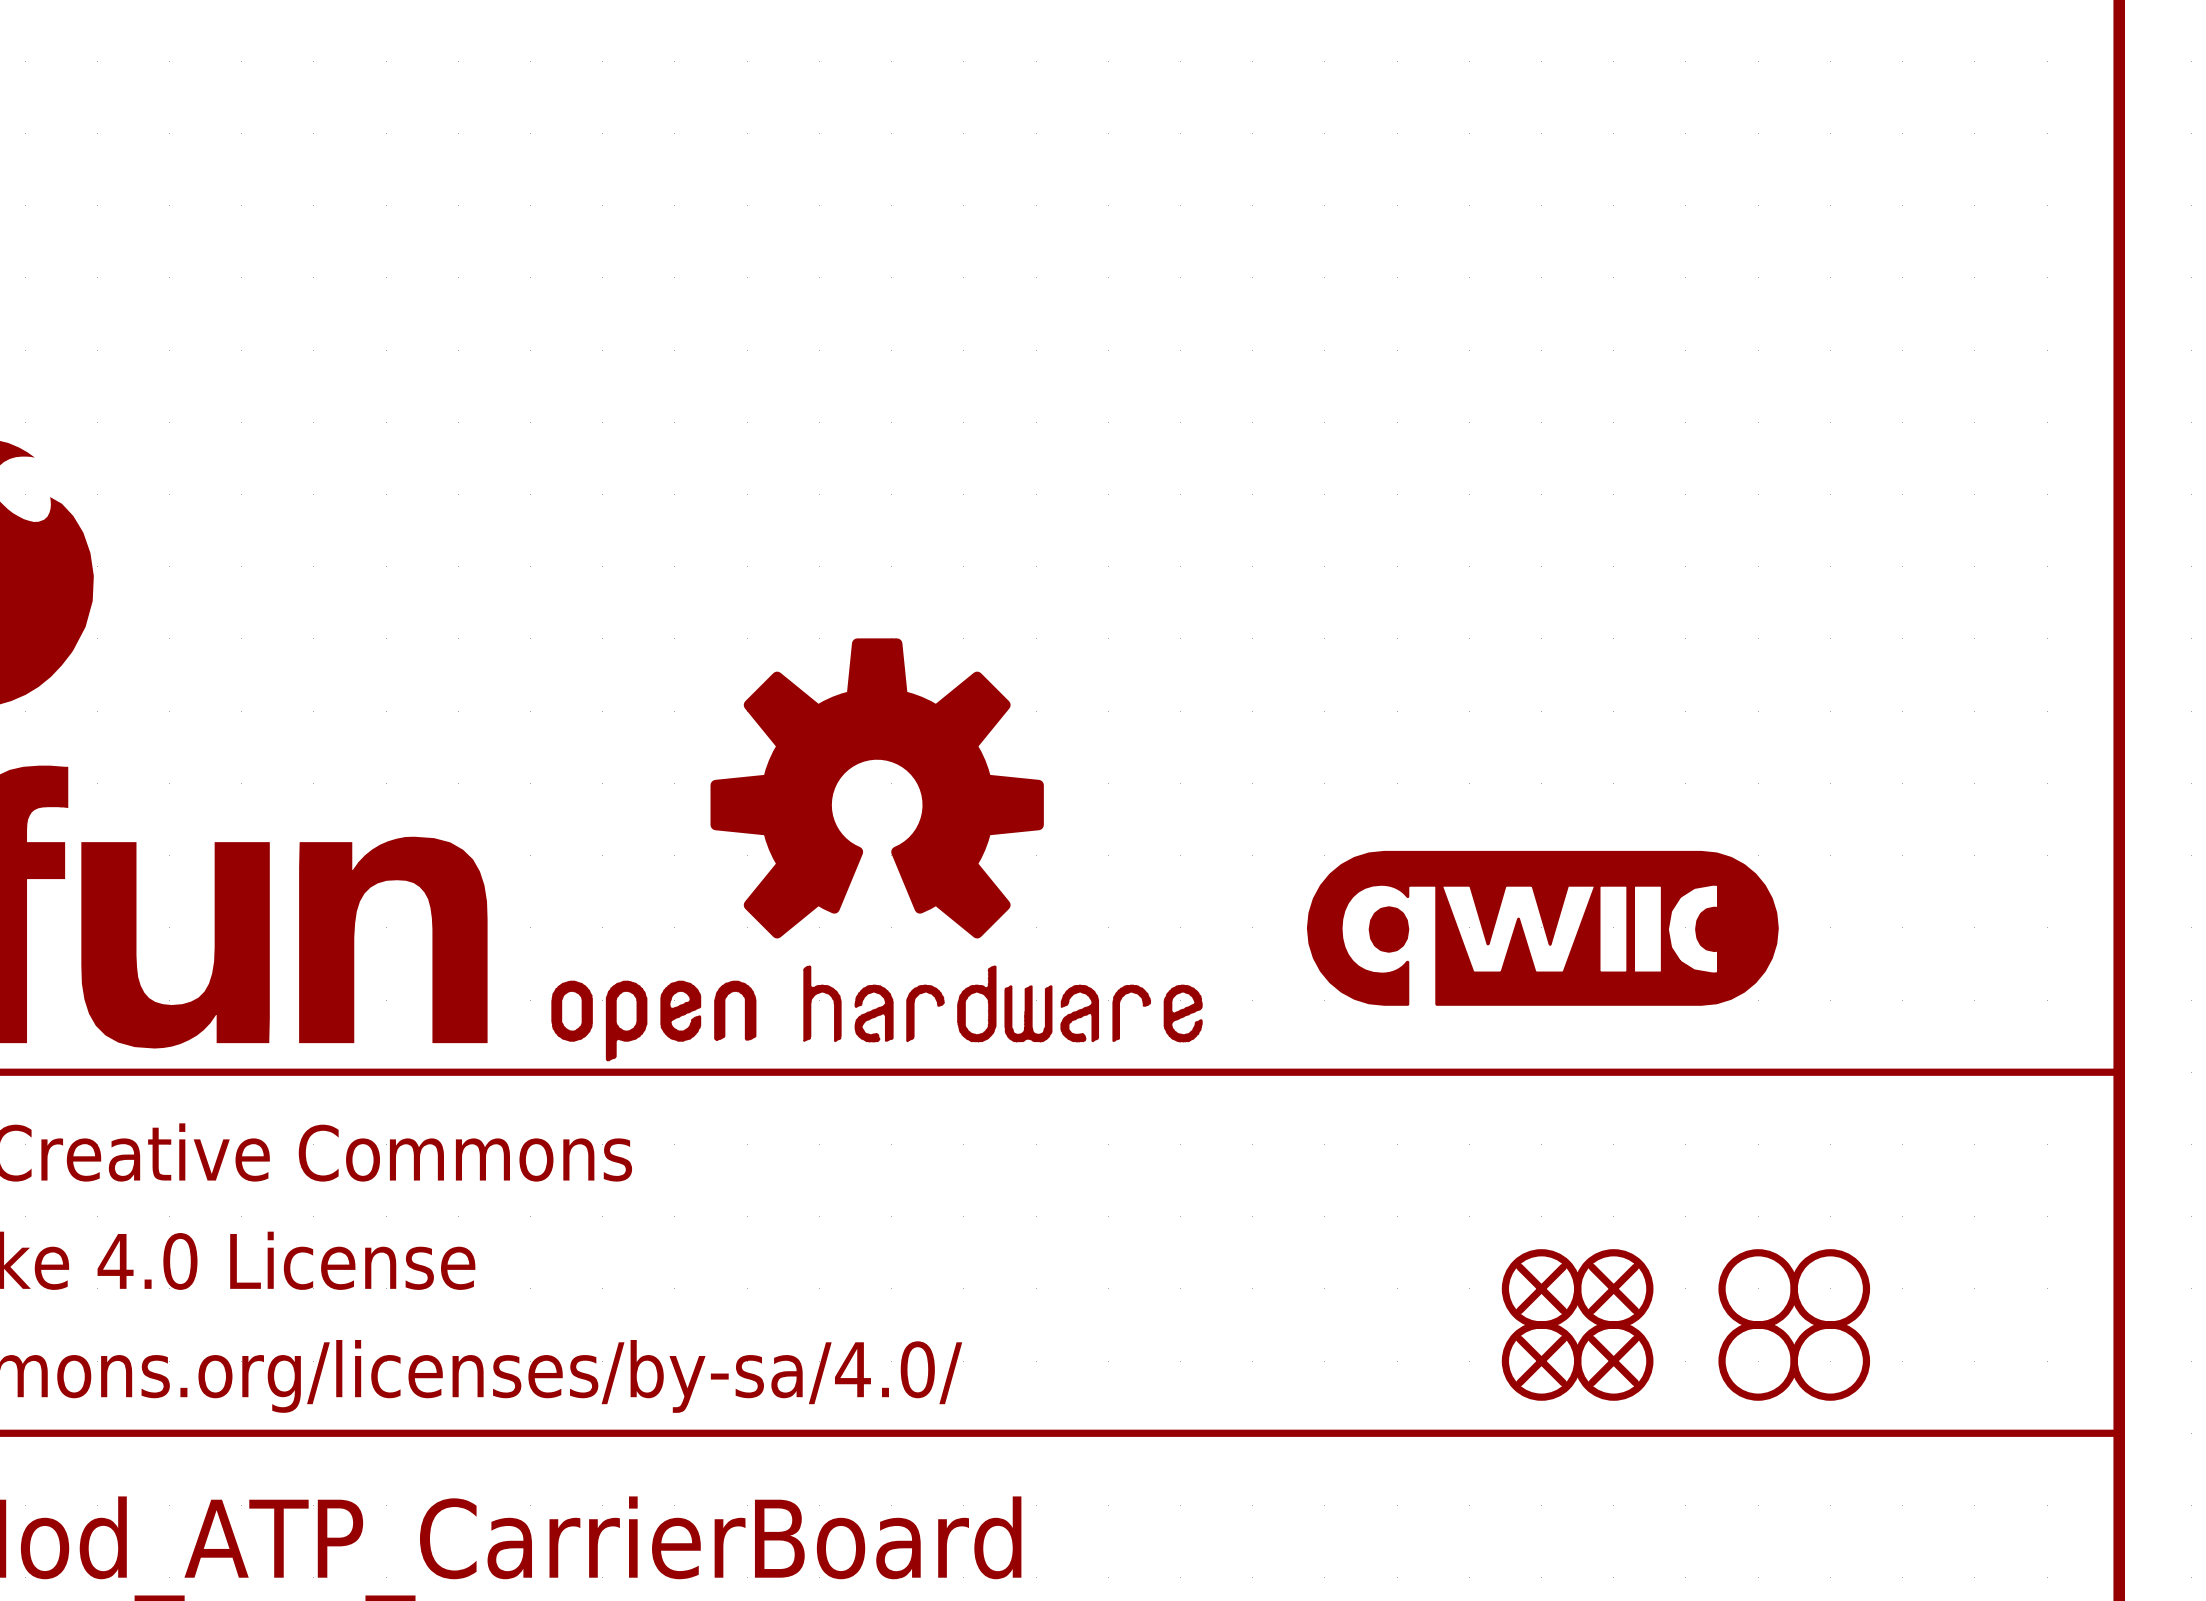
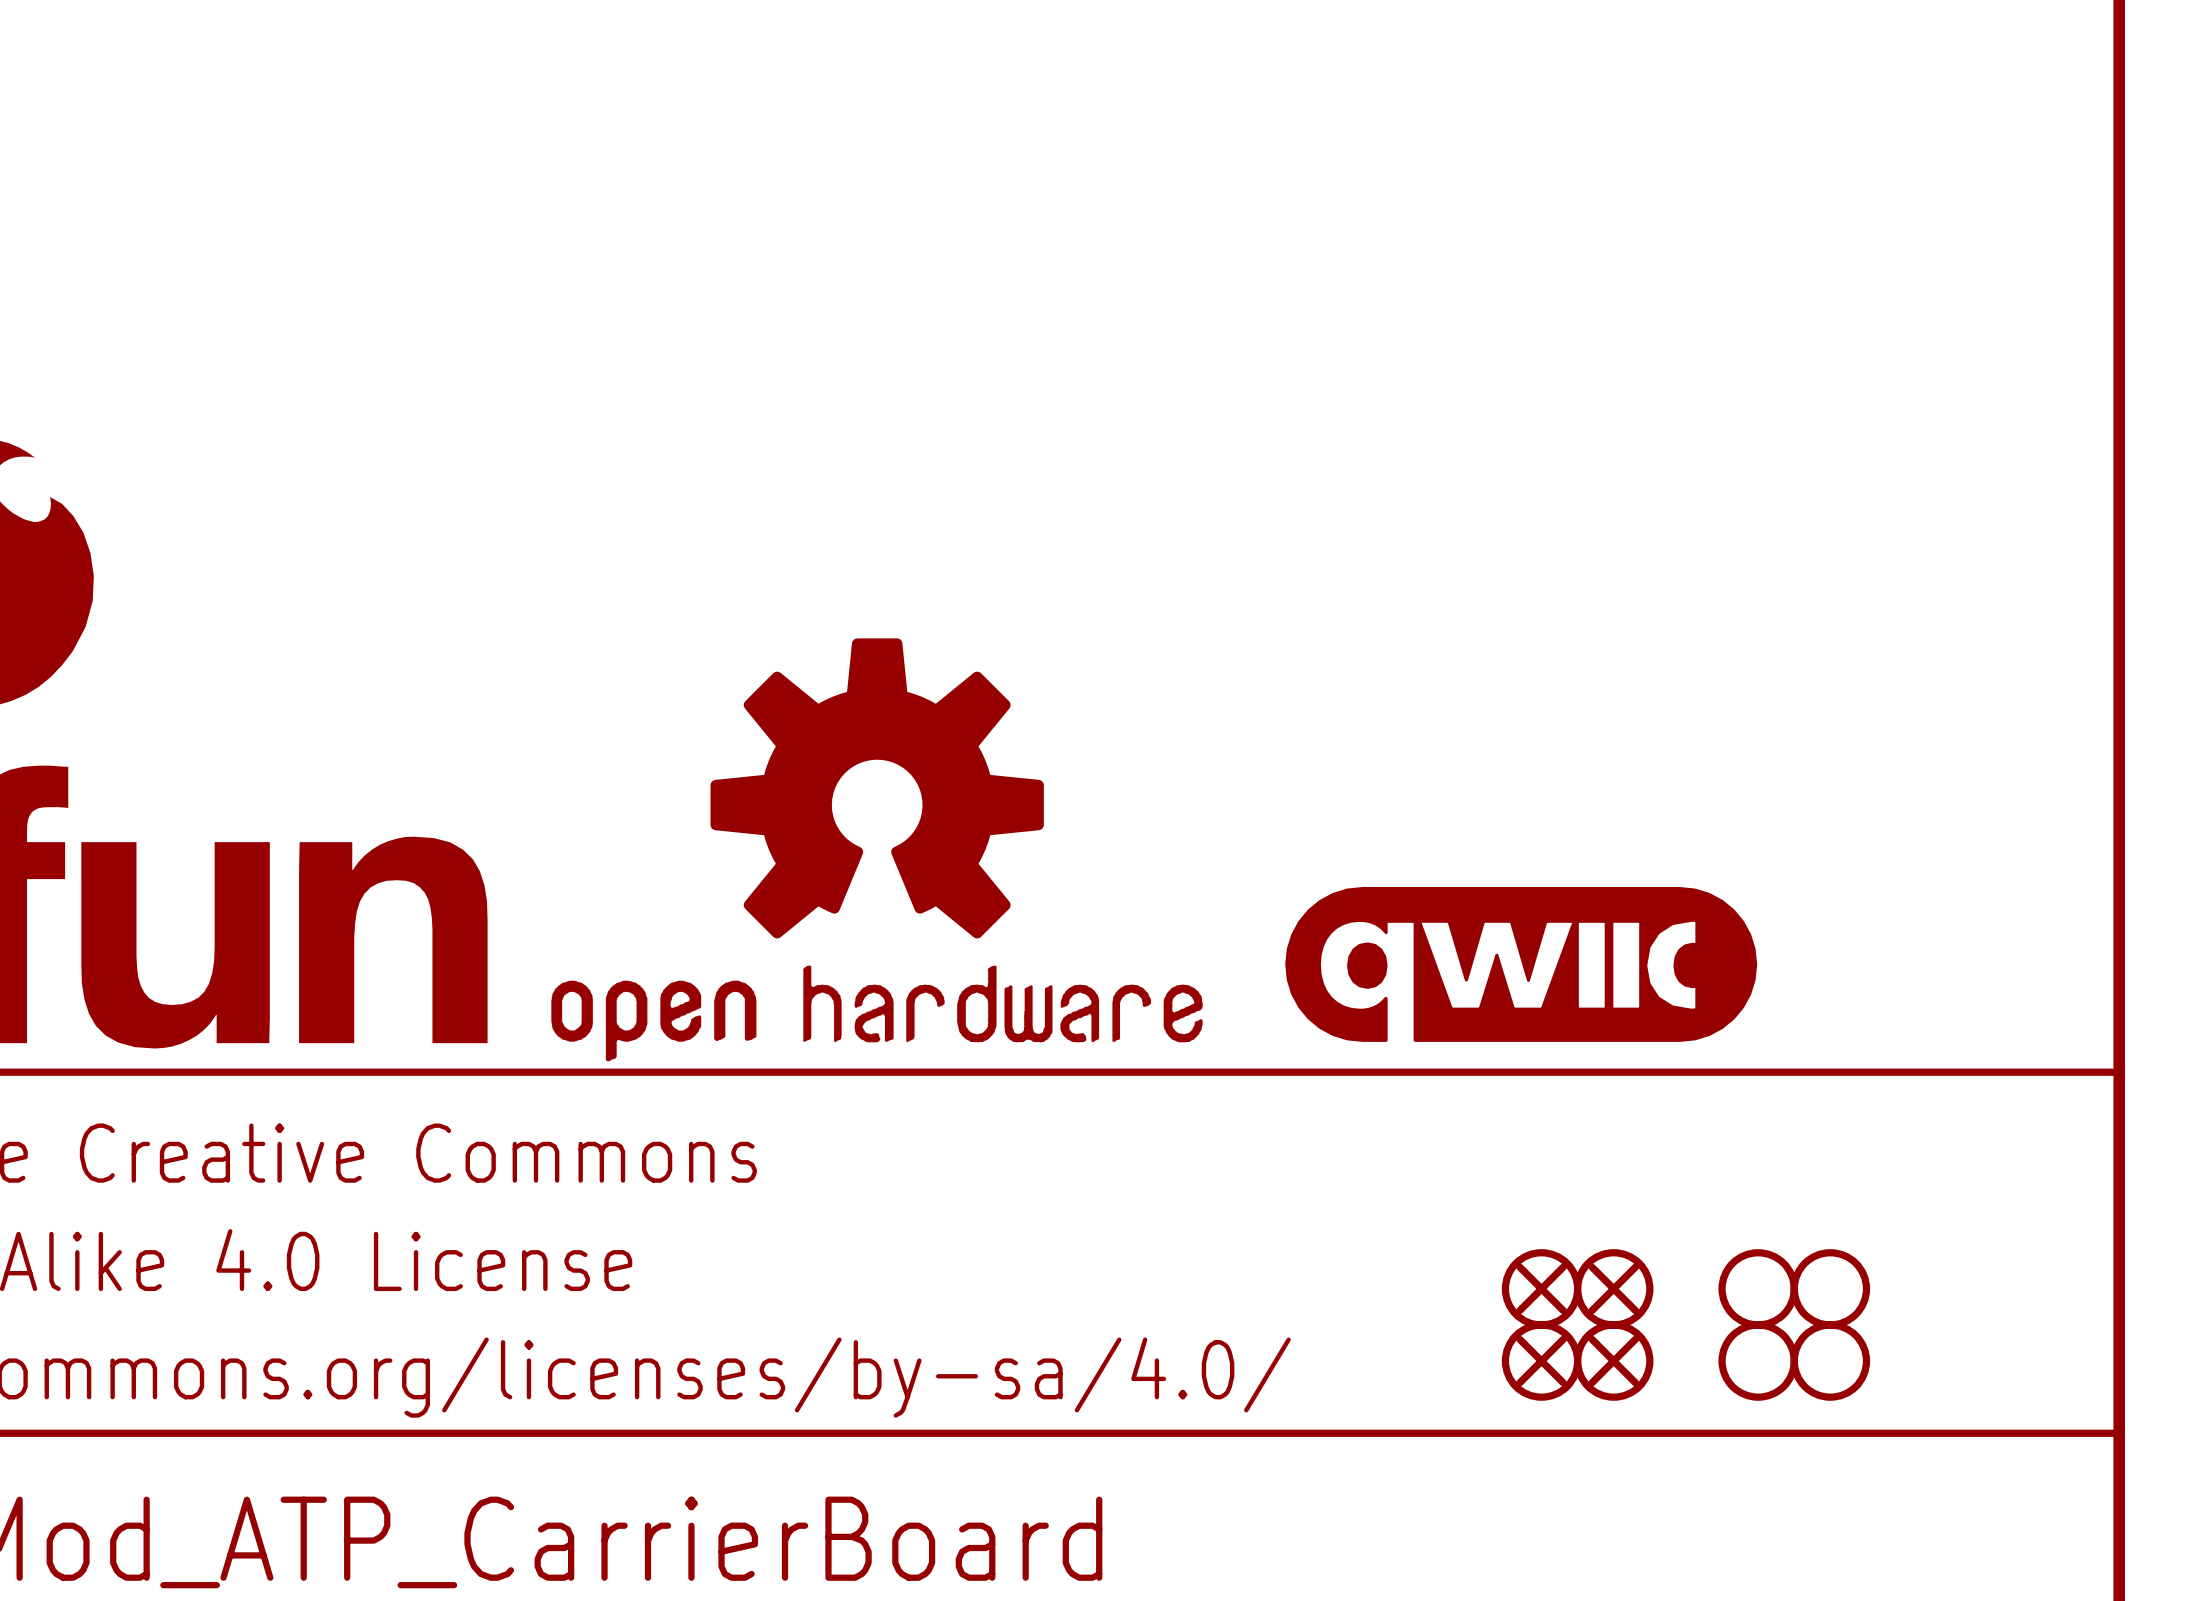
part position: (1542, 928) -> (1521, 964)

